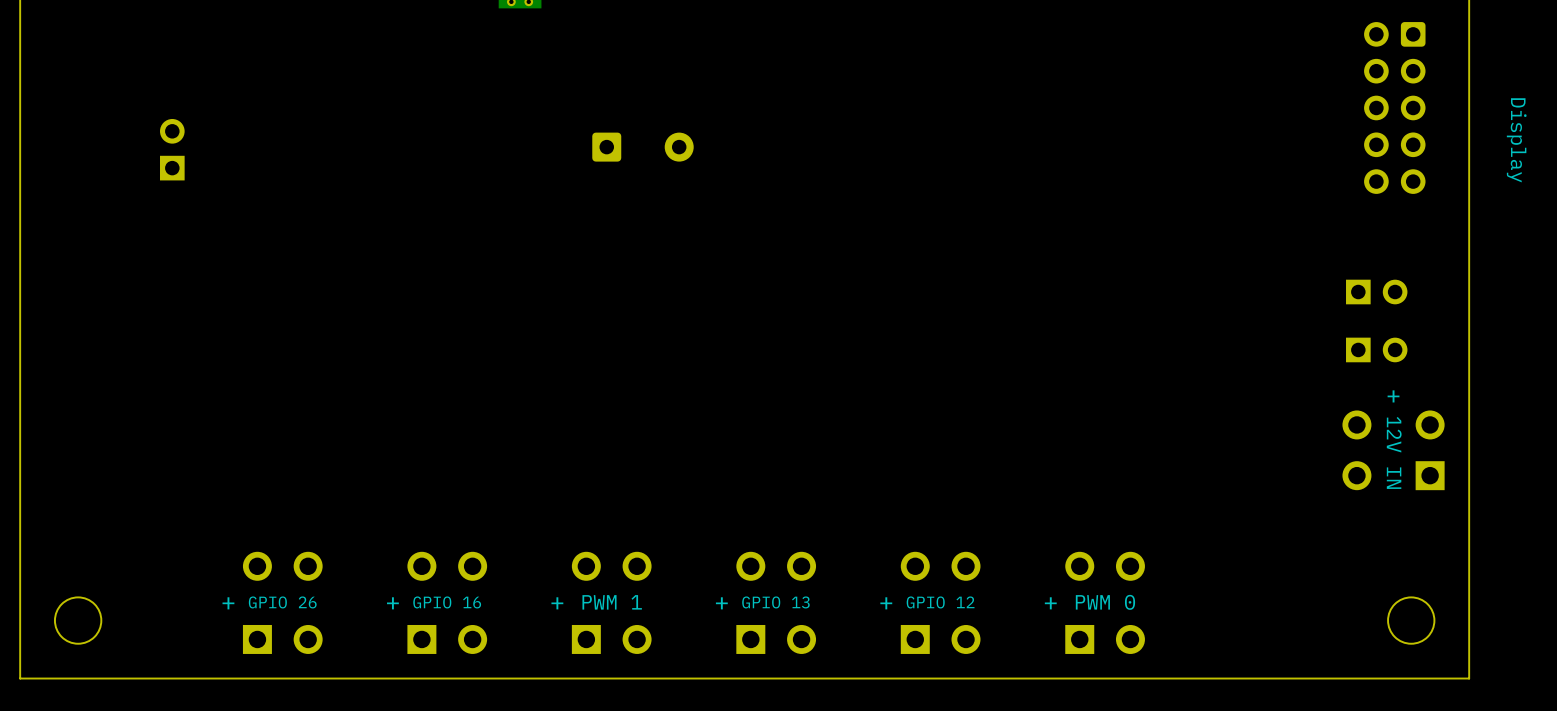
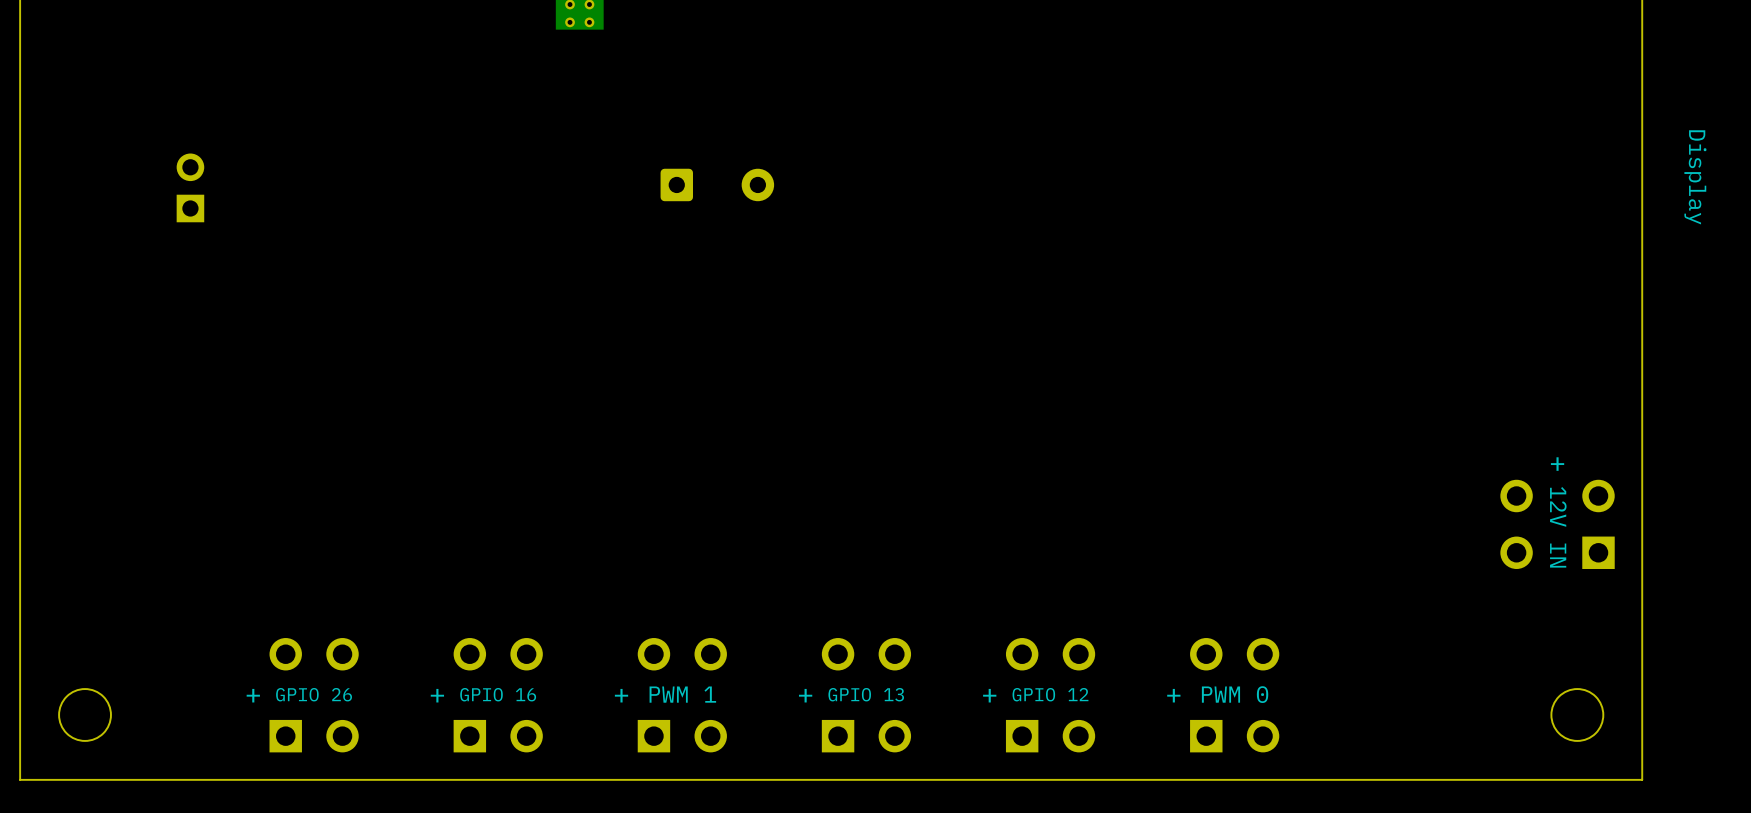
part: (1394, 107) -> none
part: (1376, 292) -> none
part: (1376, 349) -> none

